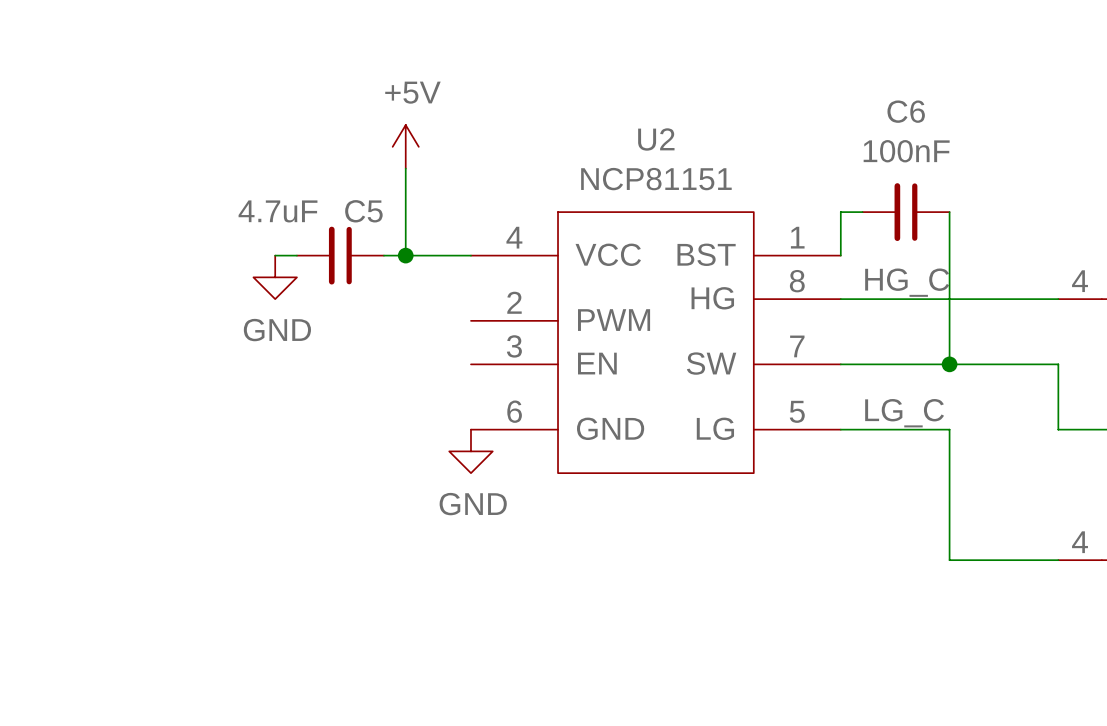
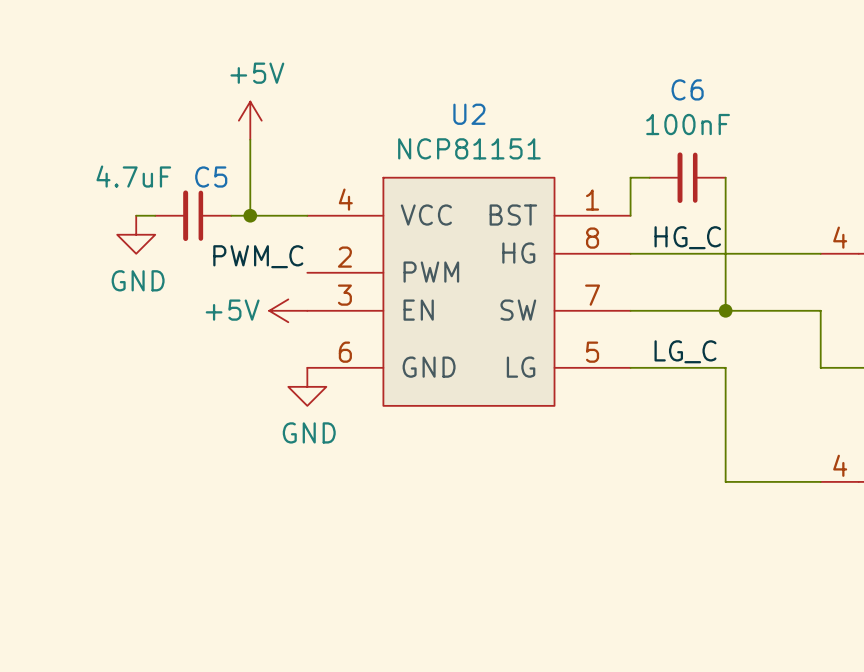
label: none -> PWM_C (258, 256)
power symbol: none -> +5V (288, 310)

